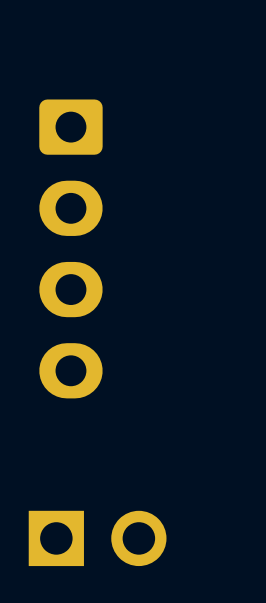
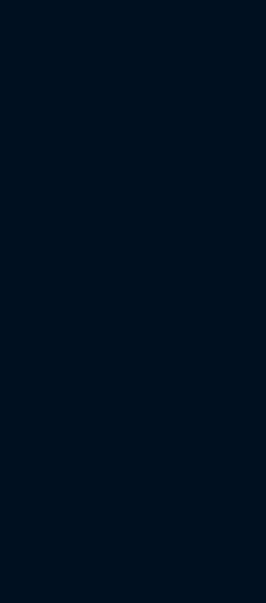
part: (70, 248) -> none
part: (97, 538) -> none

